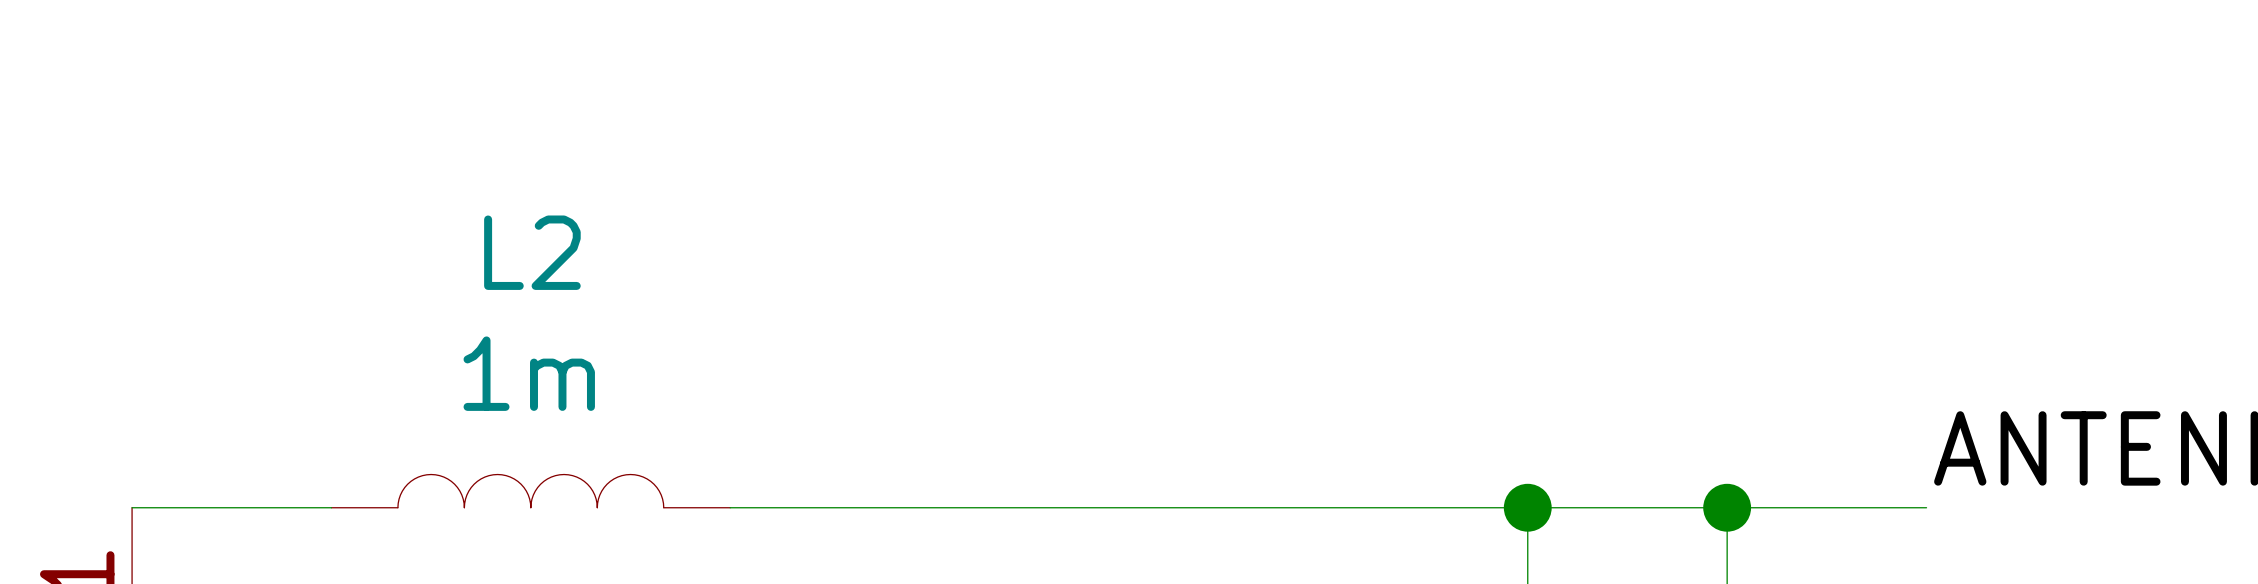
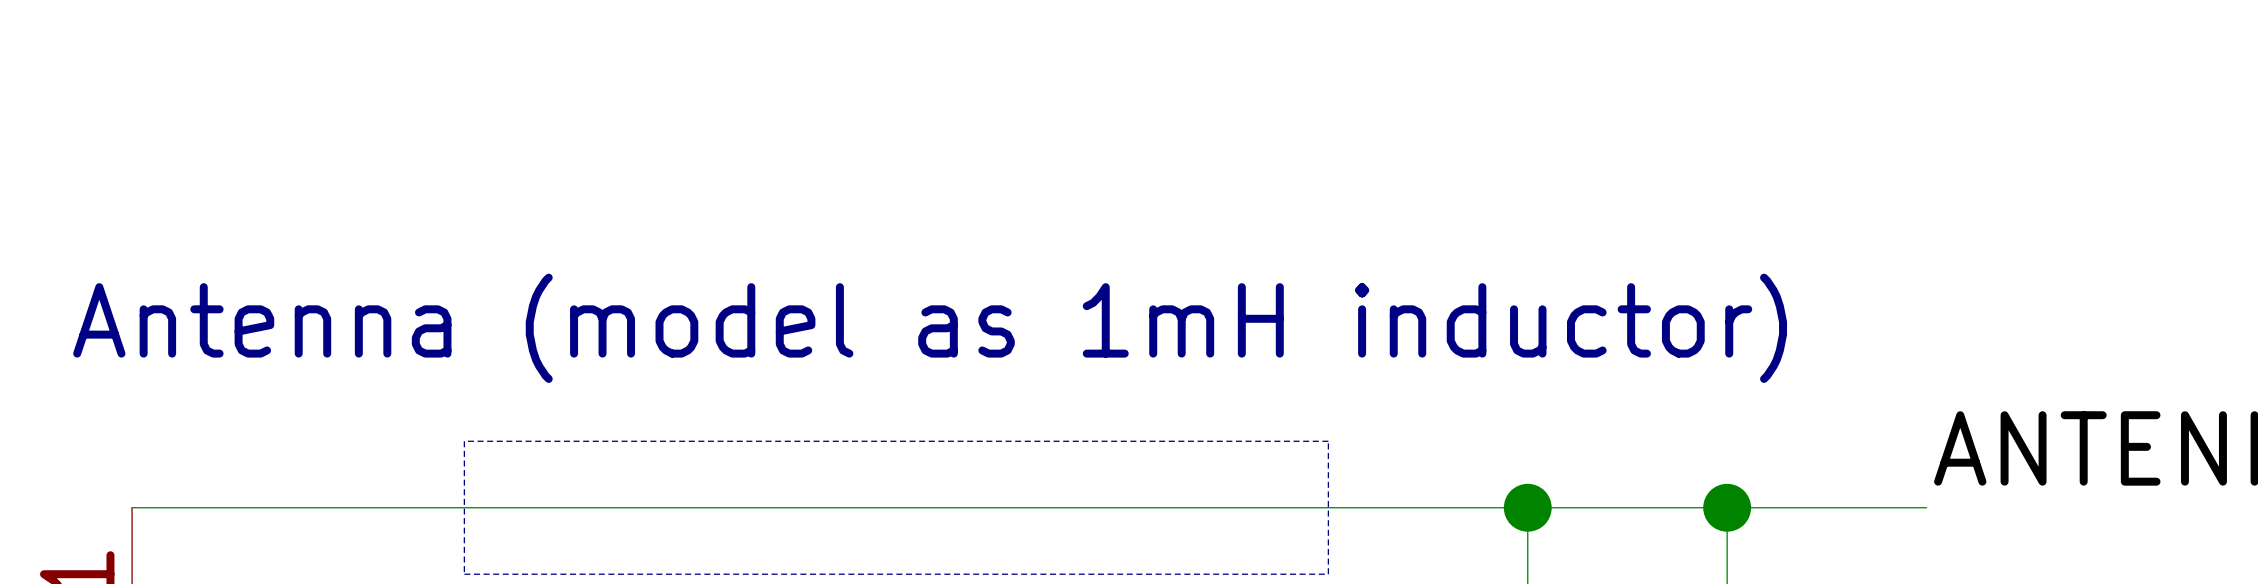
text: none -> Antenna (model as 1mH inductor) (930, 328)
line: none -> (464, 441) (464, 574) (1328, 574) (1328, 441) (464, 441)
L2: 1m (530, 491) -> none
wire: none -> (331, 507) (730, 507)

